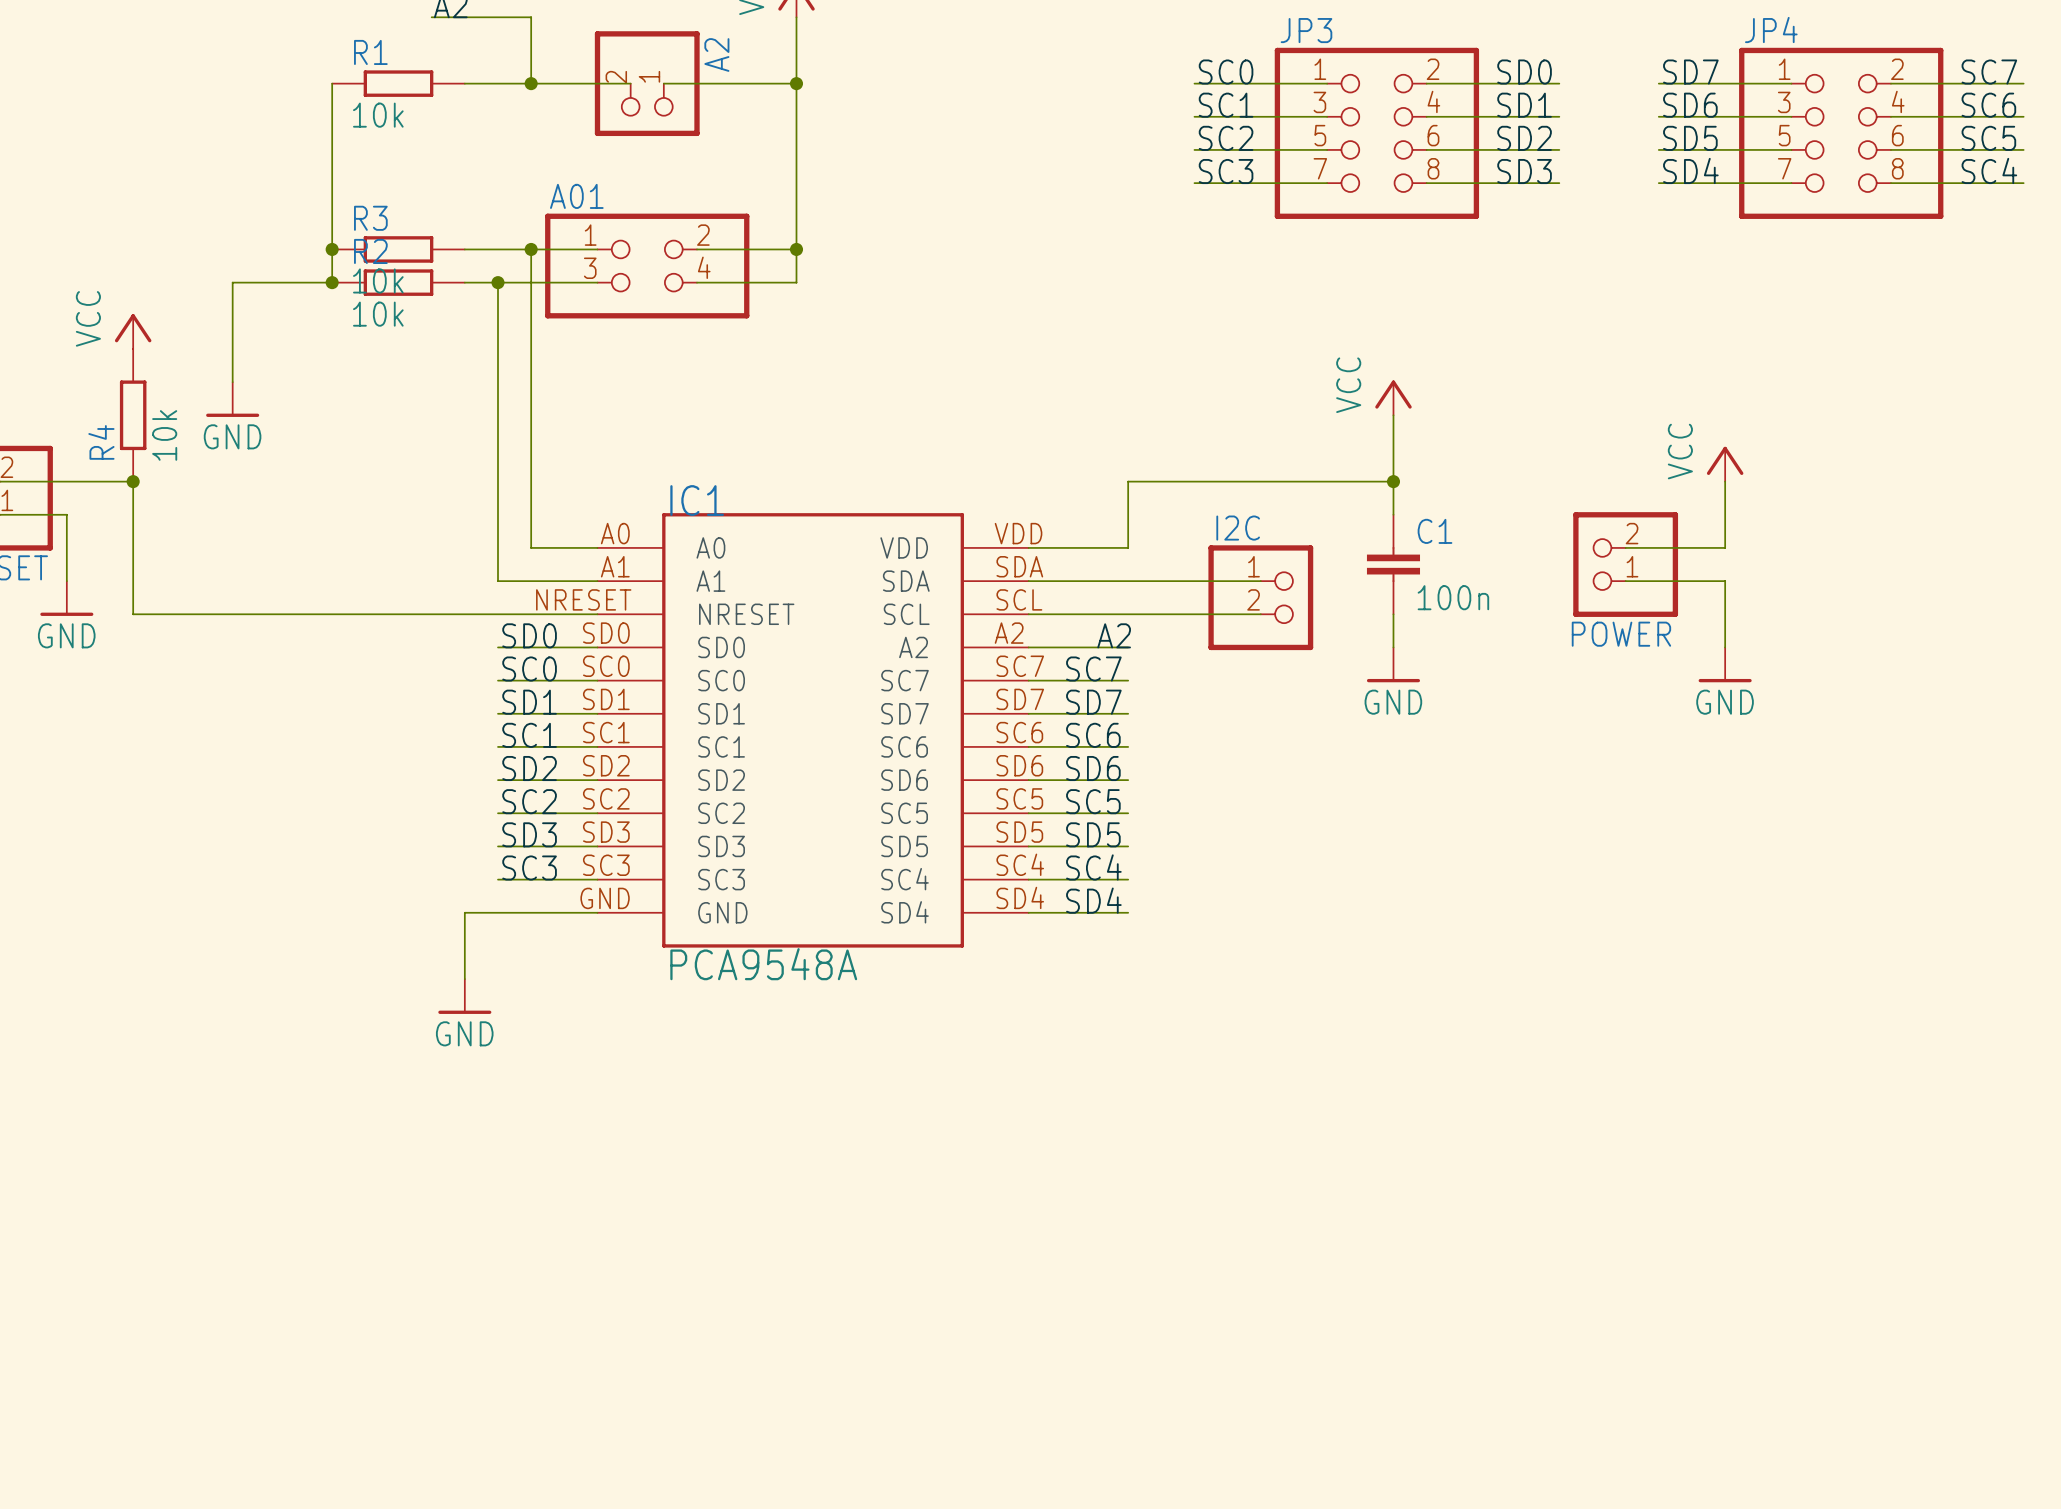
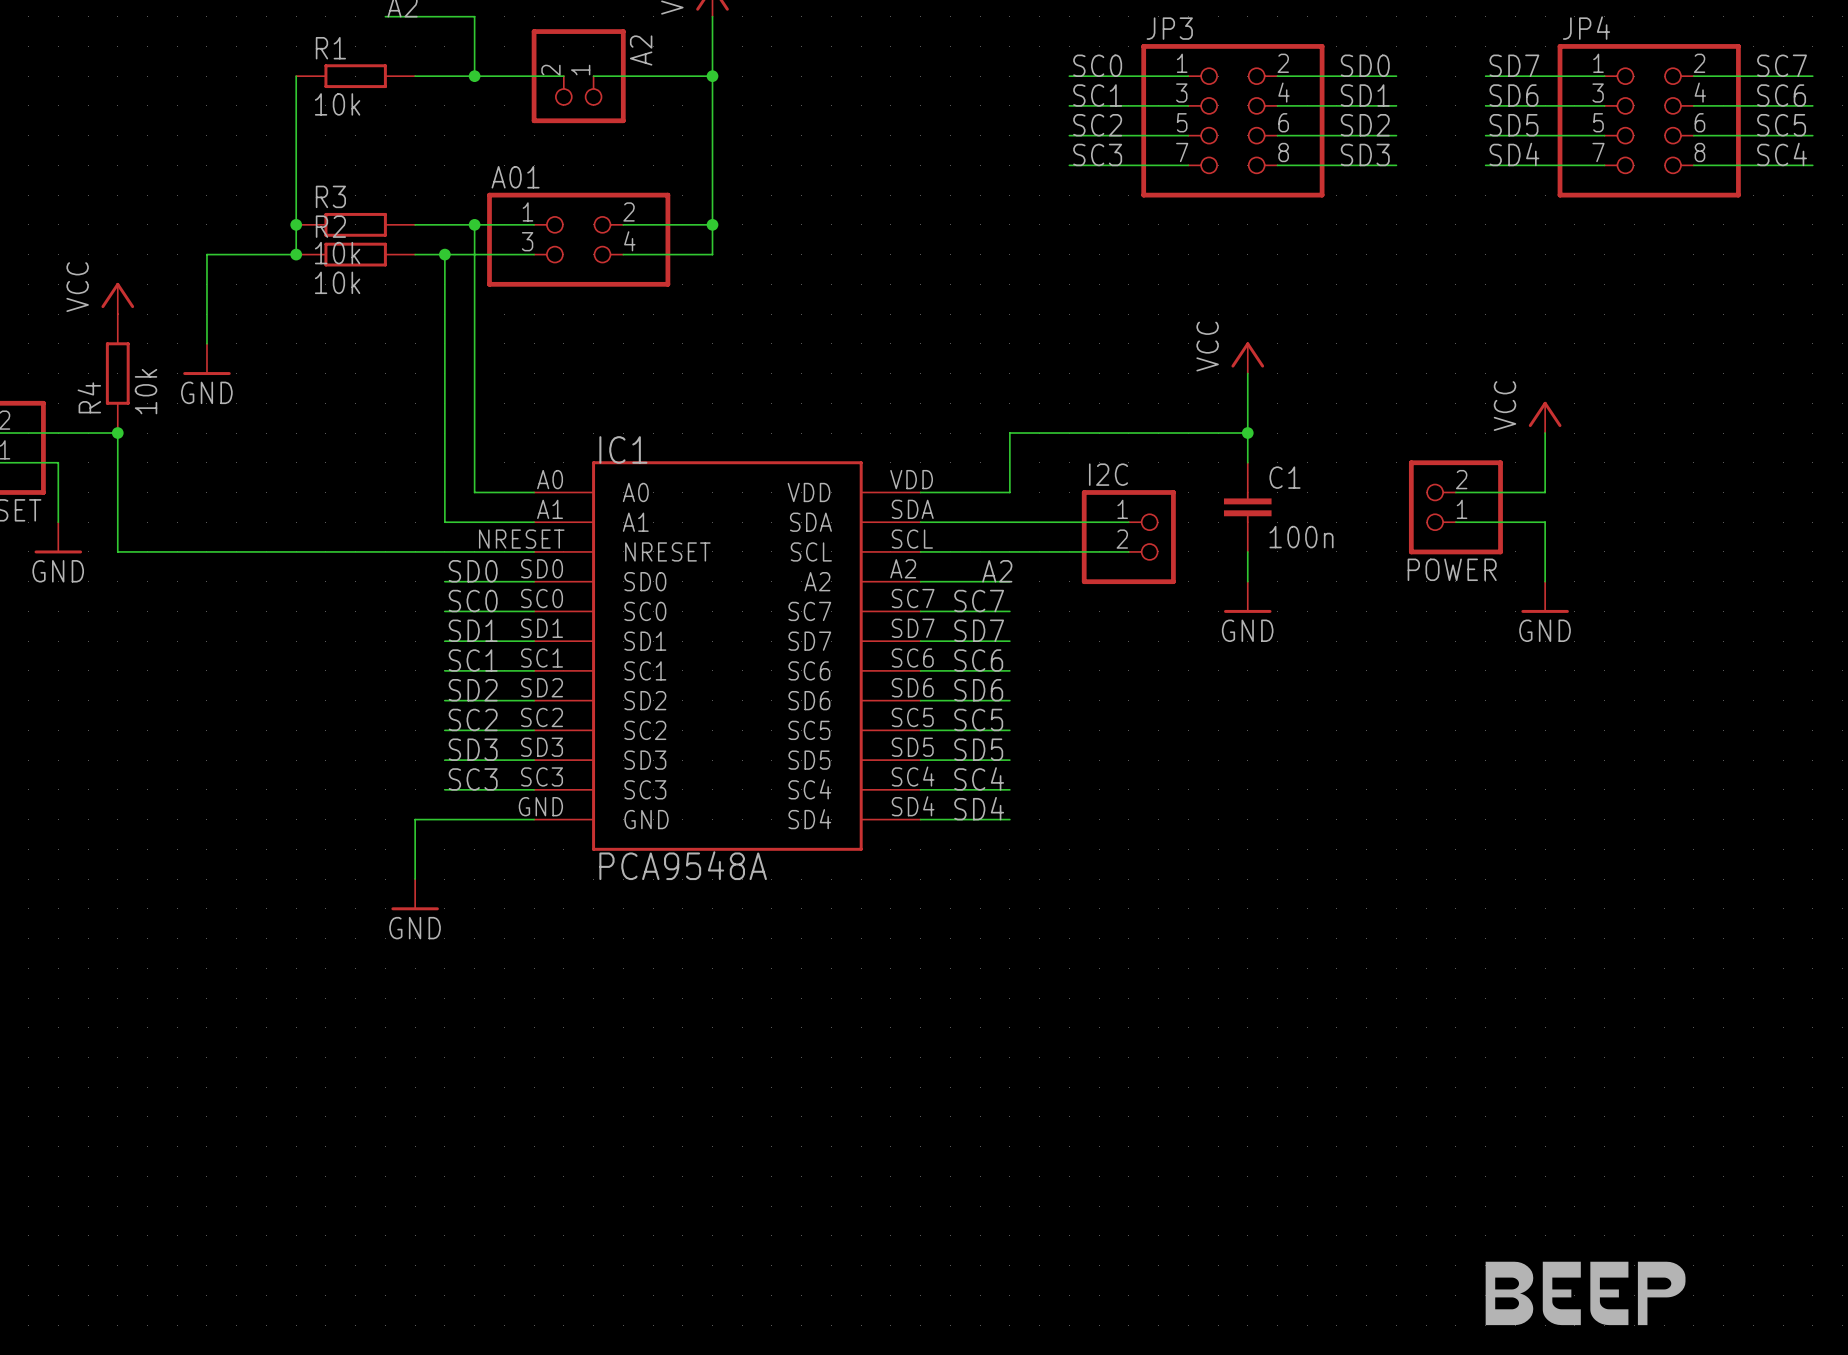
part: none -> (1585, 1293)

